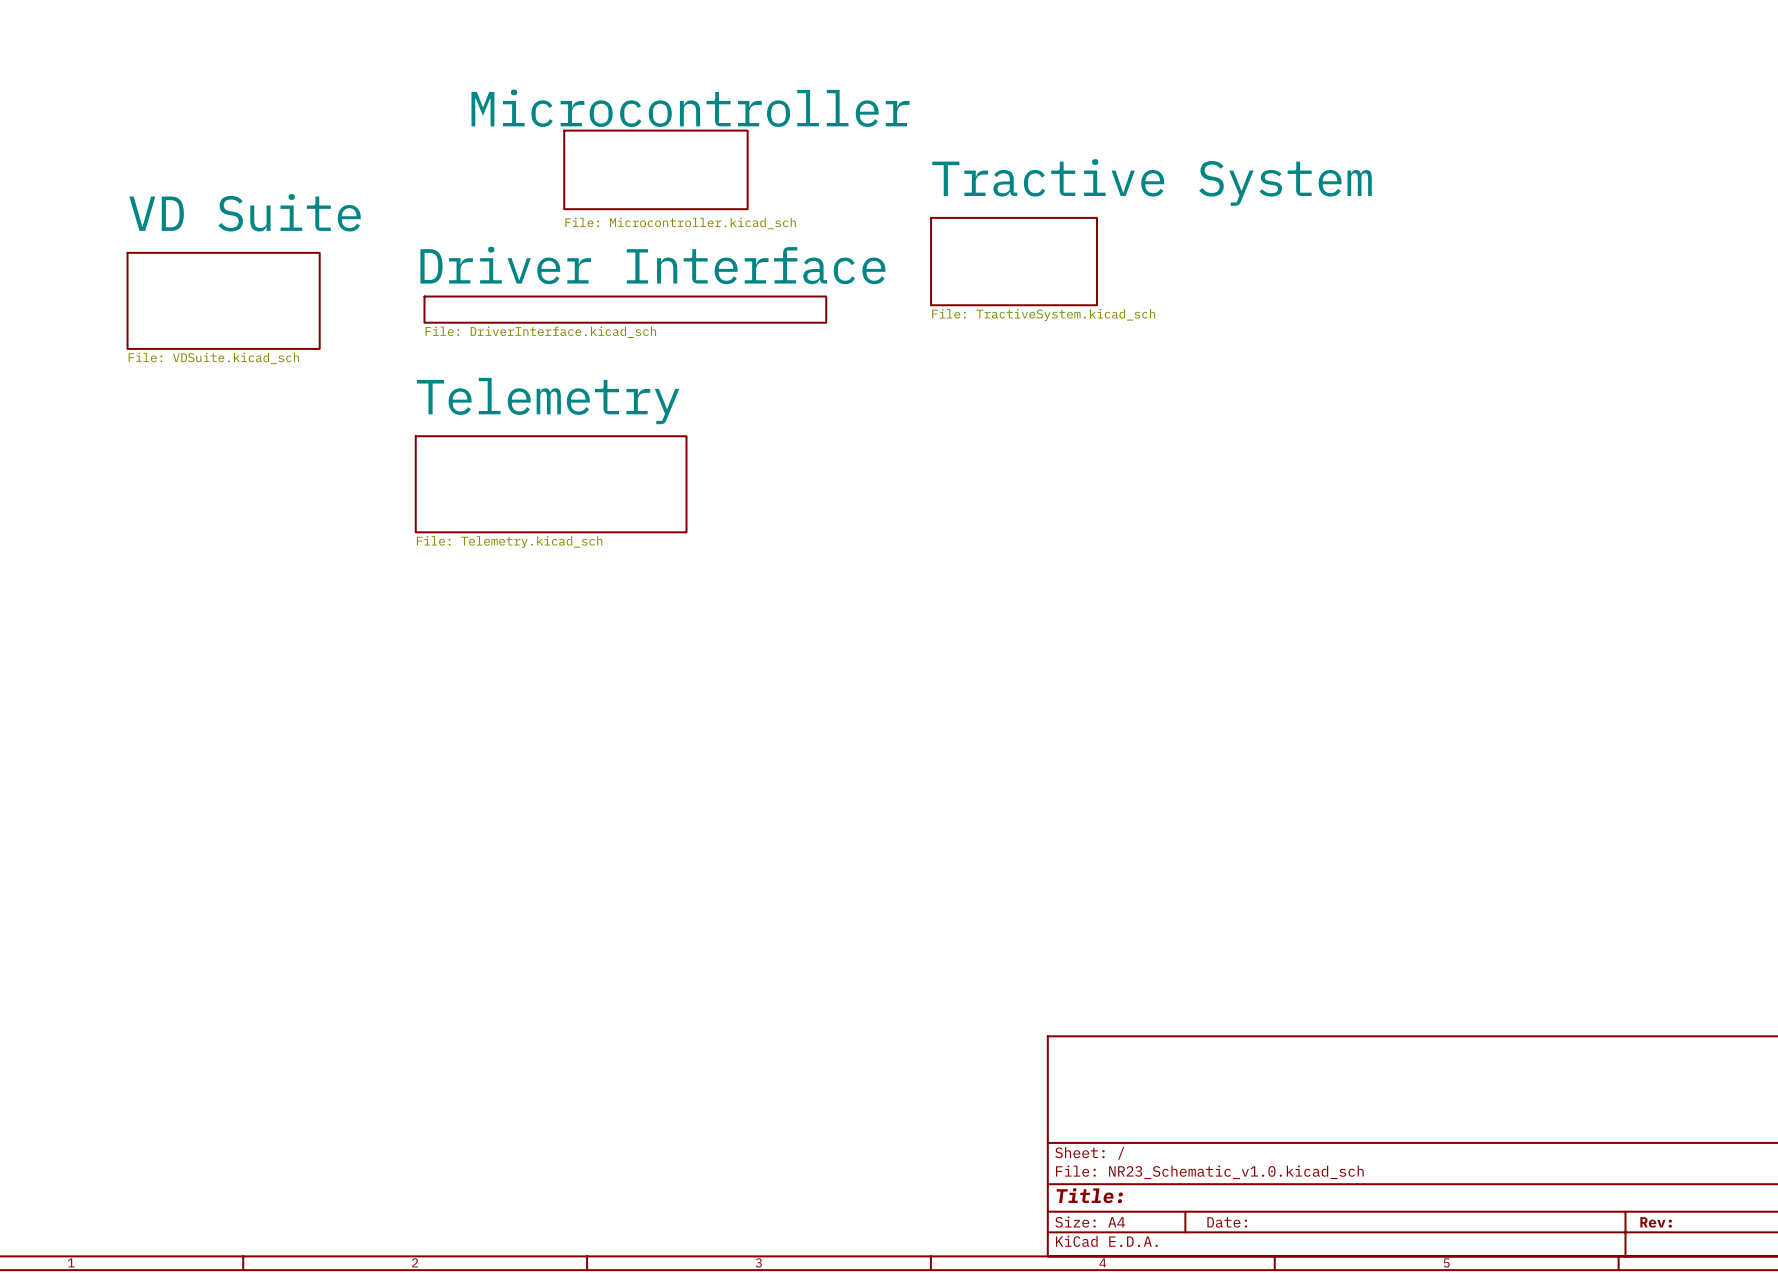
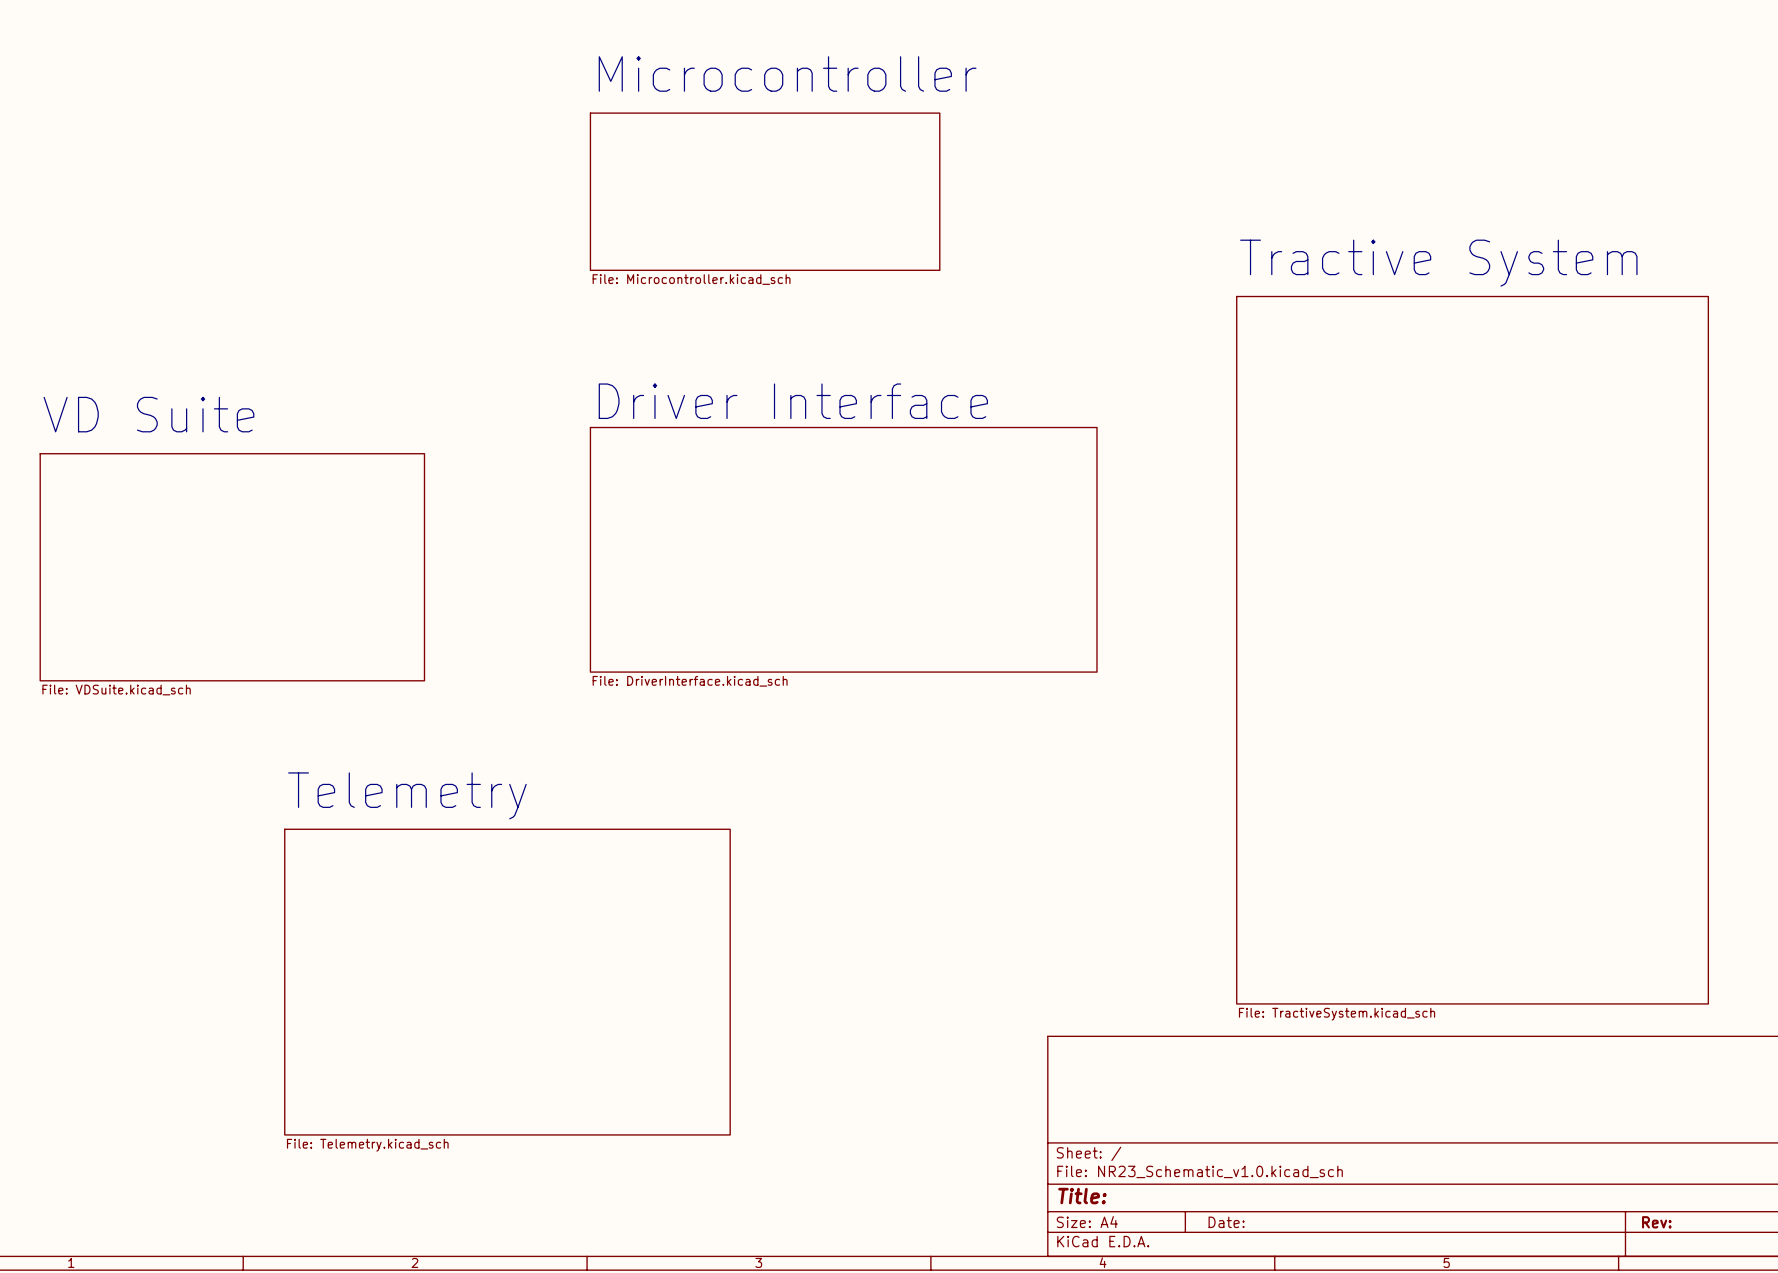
sheet Microcontroller: File: Microcontroller.kicad_sch (655, 169) -> none
sheet Microcontroller: none -> File: Microcontroller.kicad_sch (765, 191)
sheet Tractive System: File: TractiveSystem.kicad_sch (1014, 261) -> none
sheet VD Suite: File: VDSuite.kicad_sch (223, 300) -> none
sheet Driver Interface: File: DriverInterface.kicad_sch (625, 309) -> none
sheet Telemetry: File: Telemetry.kicad_sch (551, 484) -> none
sheet Driver Interface: none -> File: DriverInterface.kicad_sch (843, 549)
sheet VD Suite: none -> File: VDSuite.kicad_sch (232, 567)
sheet Tractive System: none -> File: TractiveSystem.kicad_sch (1472, 650)
sheet Telemetry: none -> File: Telemetry.kicad_sch (507, 982)

